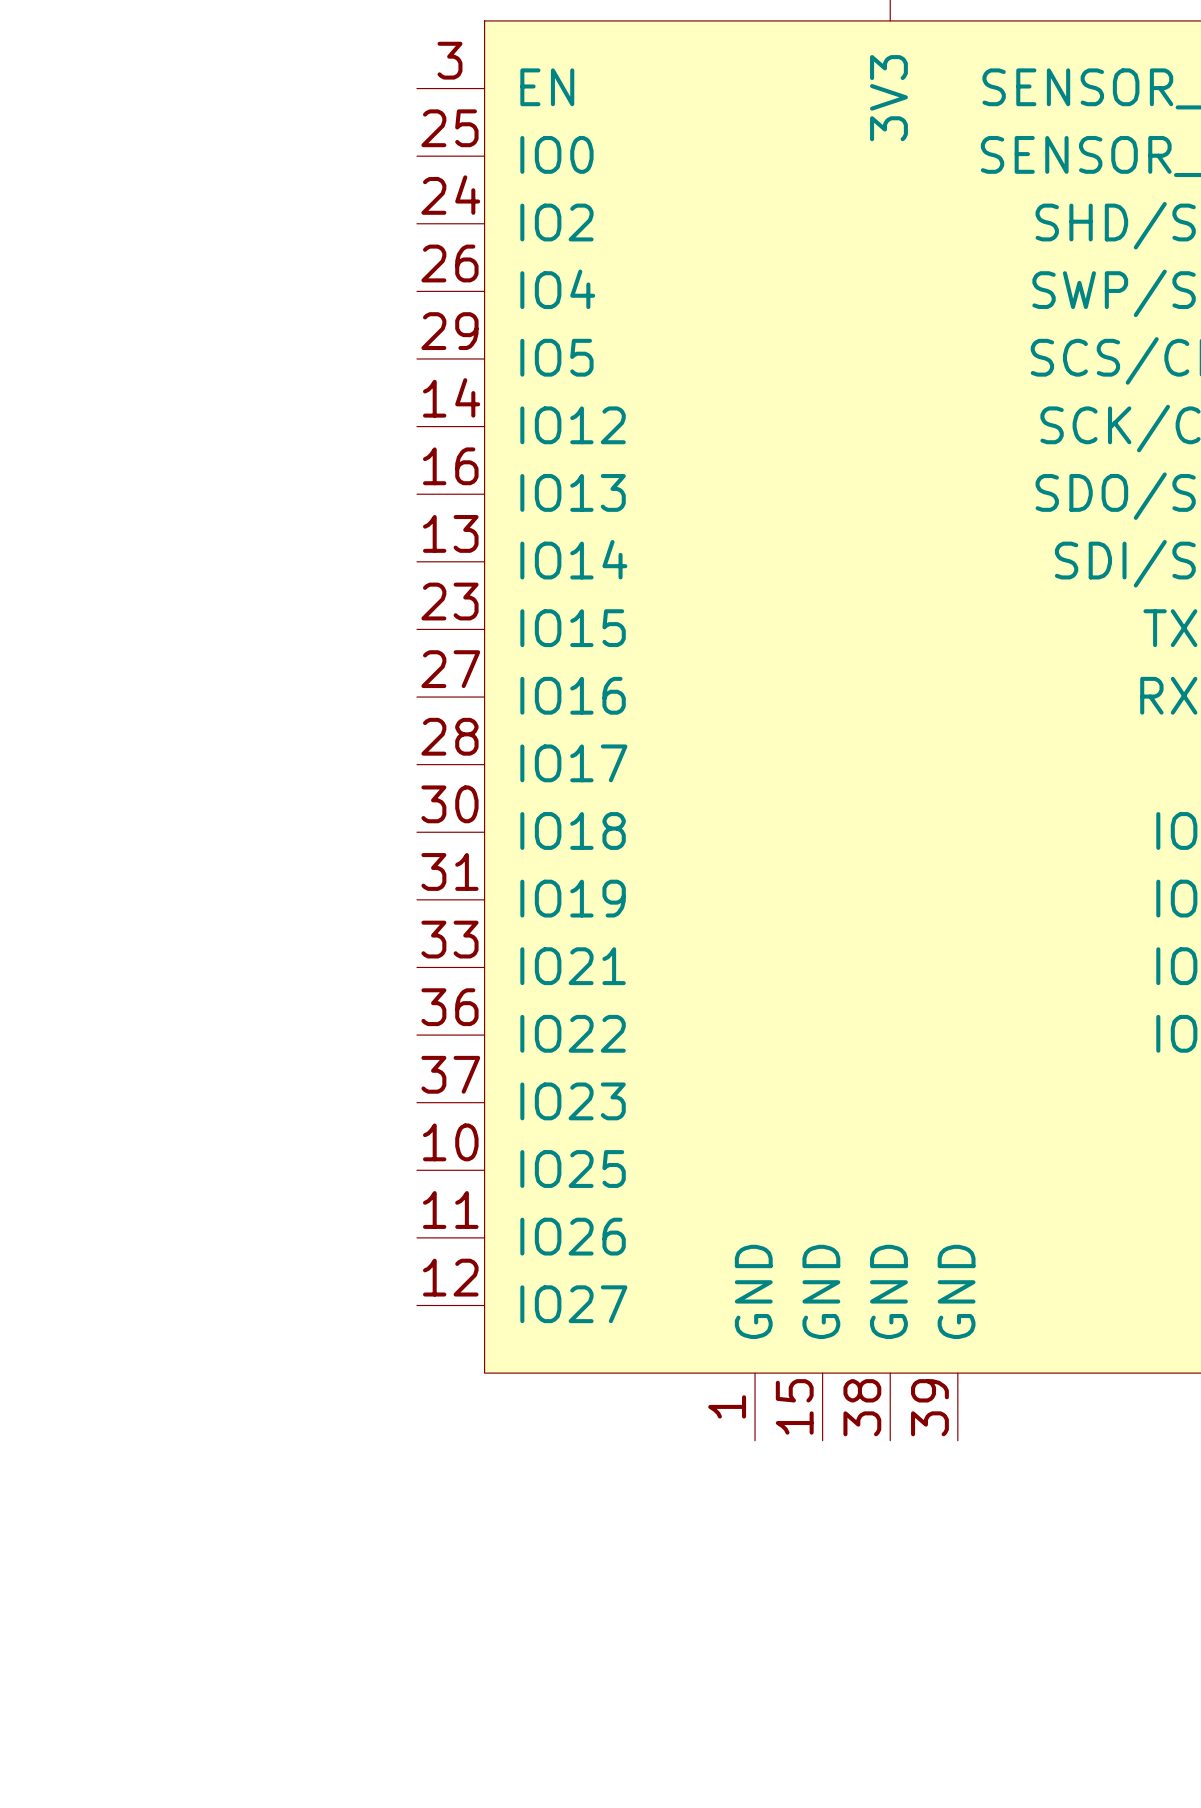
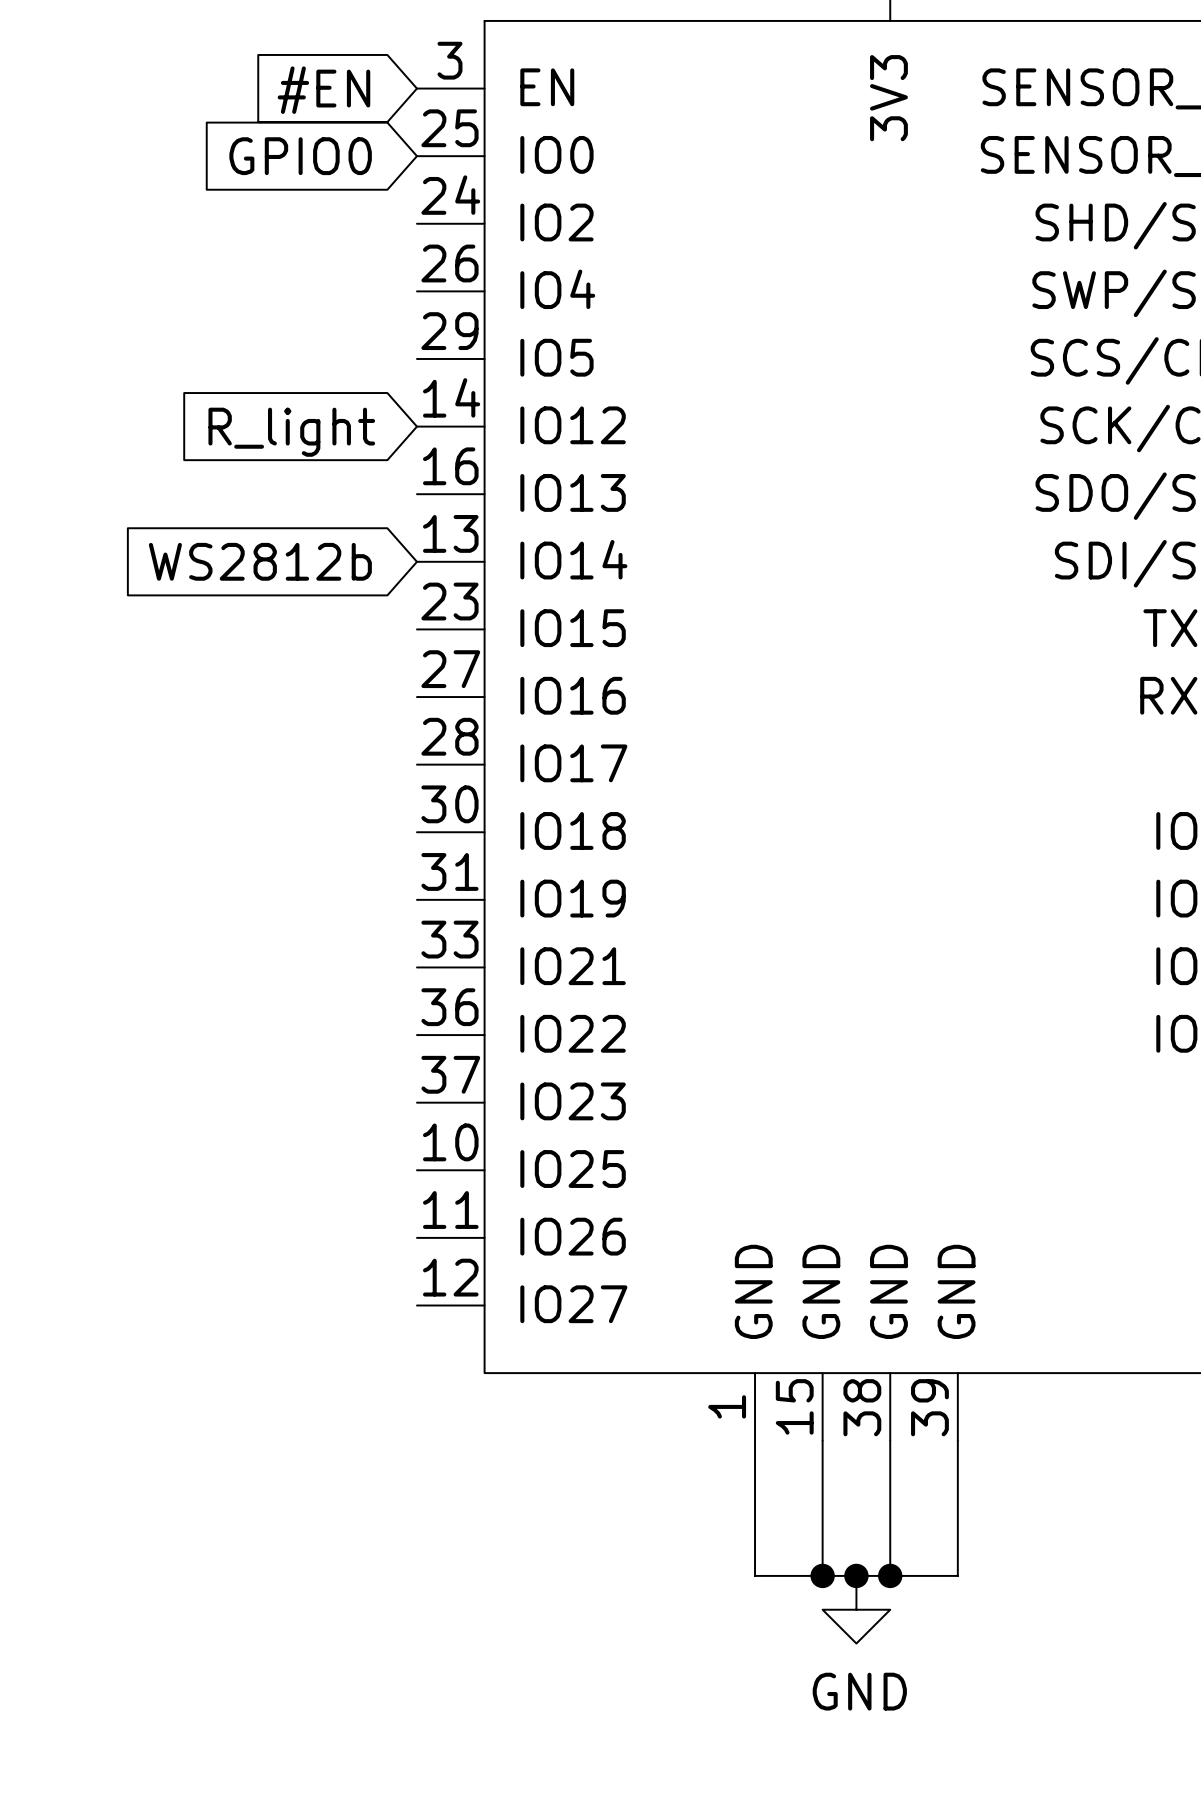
global label: none -> #EN (323, 90)
global label: none -> GPIO0 (300, 156)
global label: none -> R_light (291, 432)
global label: none -> WS2812b (260, 561)
wire: none -> (755, 1440) (755, 1575) (957, 1575) (957, 1440)
wire: none -> (822, 1440) (822, 1575)
wire: none -> (890, 1440) (890, 1575)
junction: none -> (822, 1575)
junction: none -> (856, 1575)
junction: none -> (890, 1575)
power symbol: none -> GND (856, 1609)

